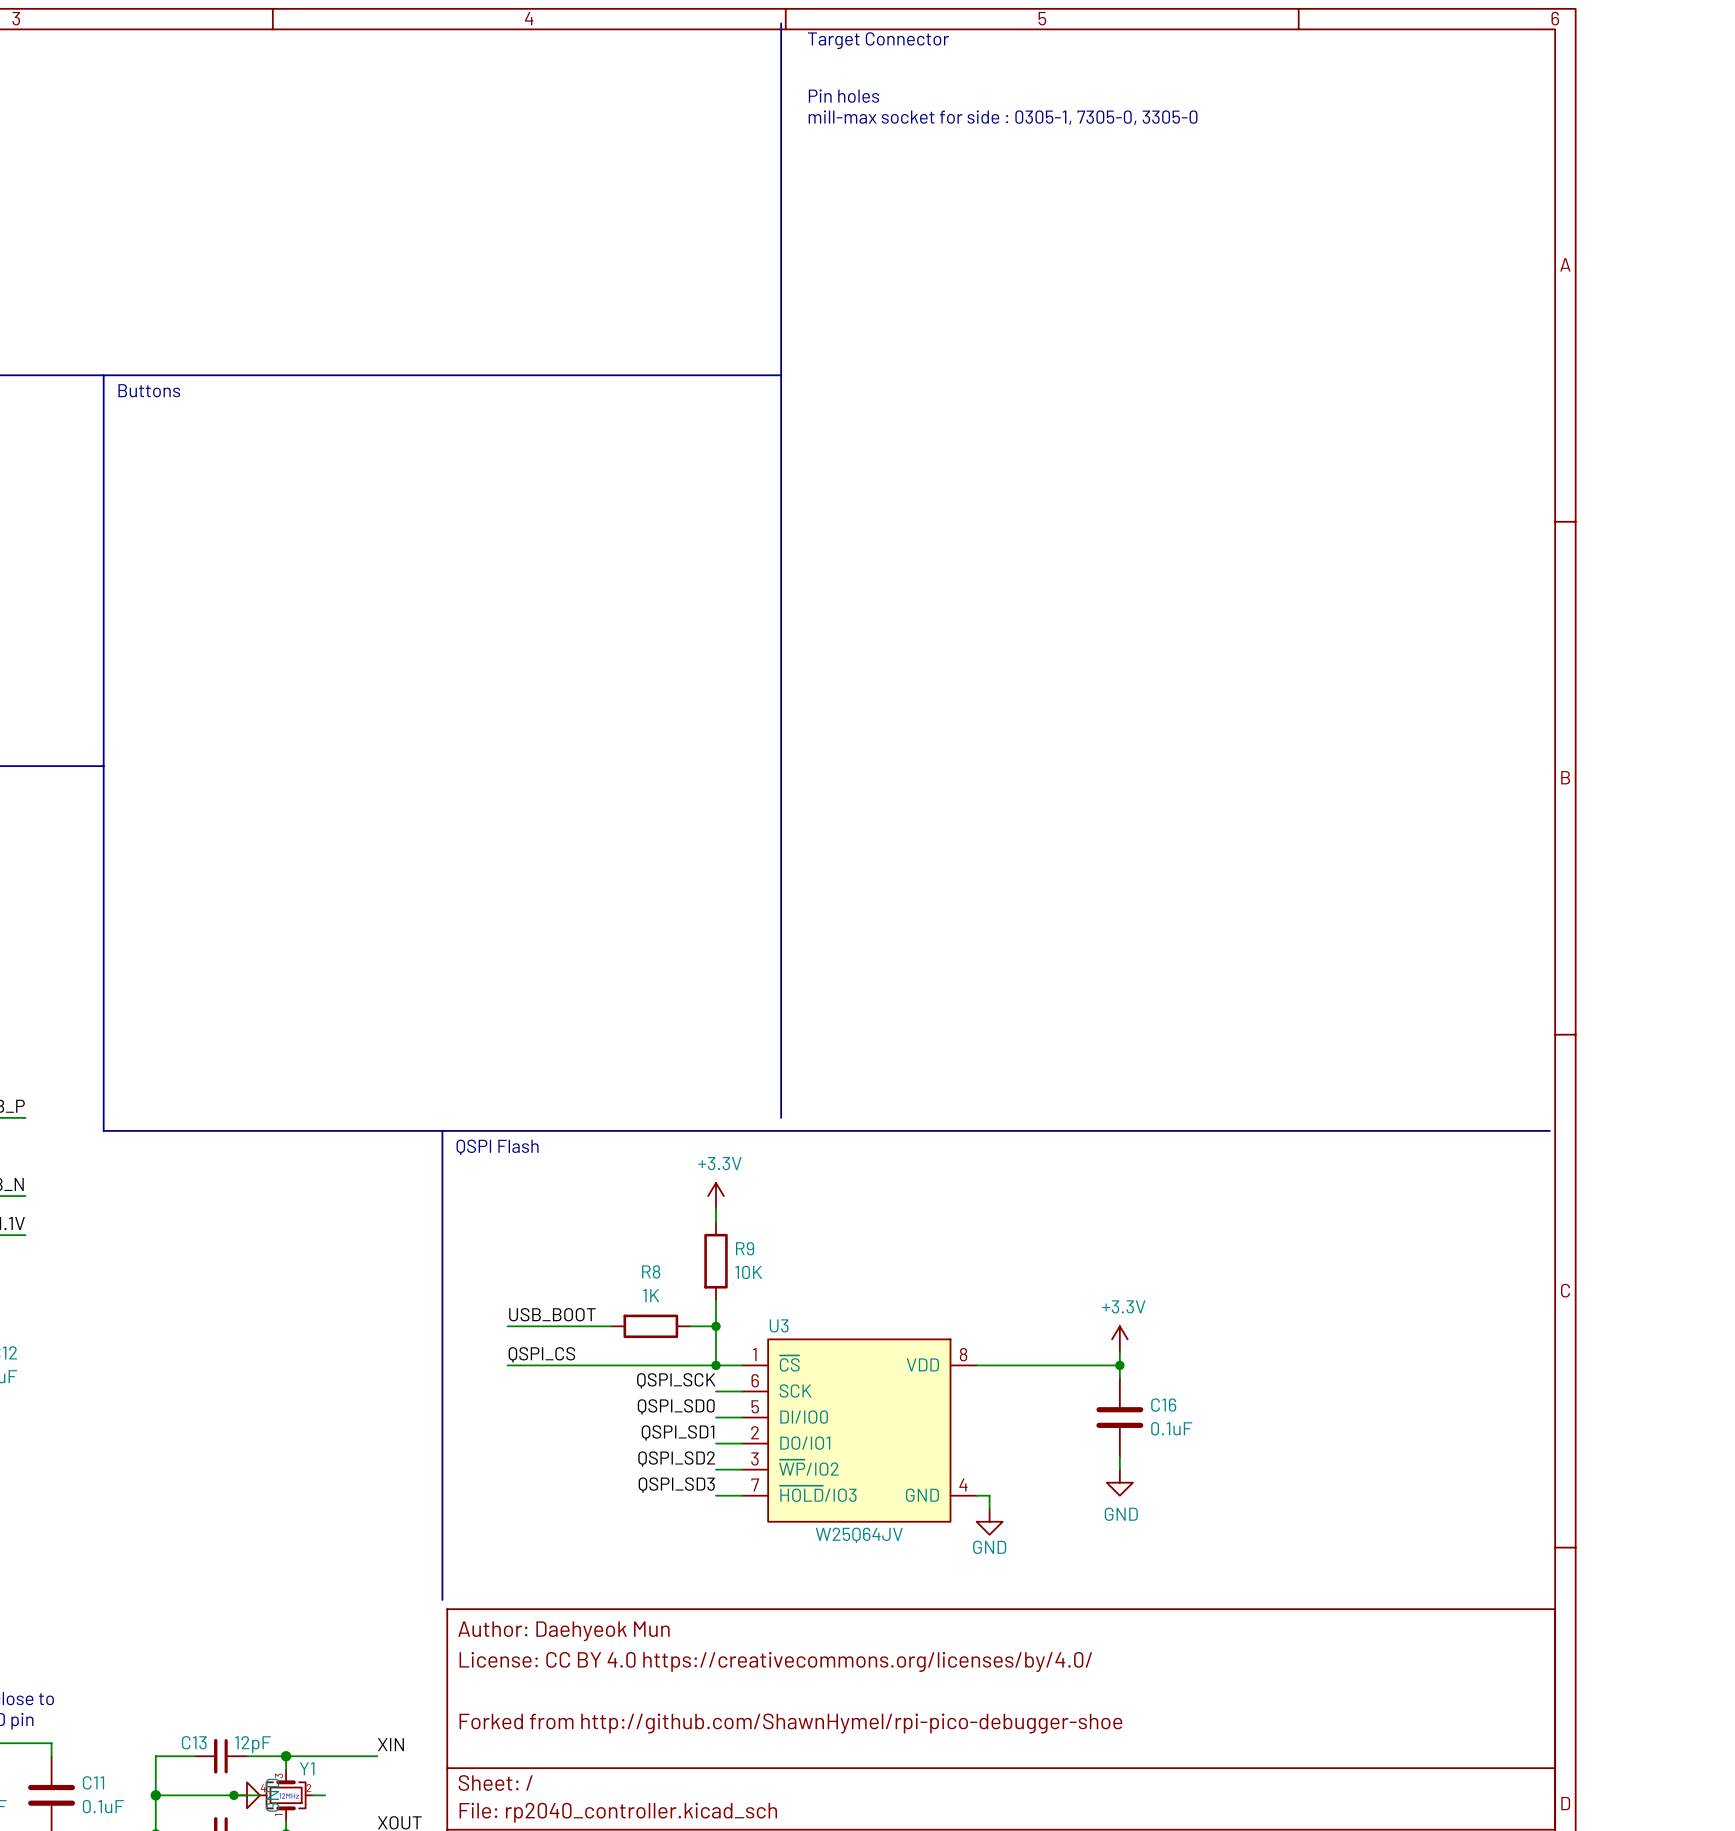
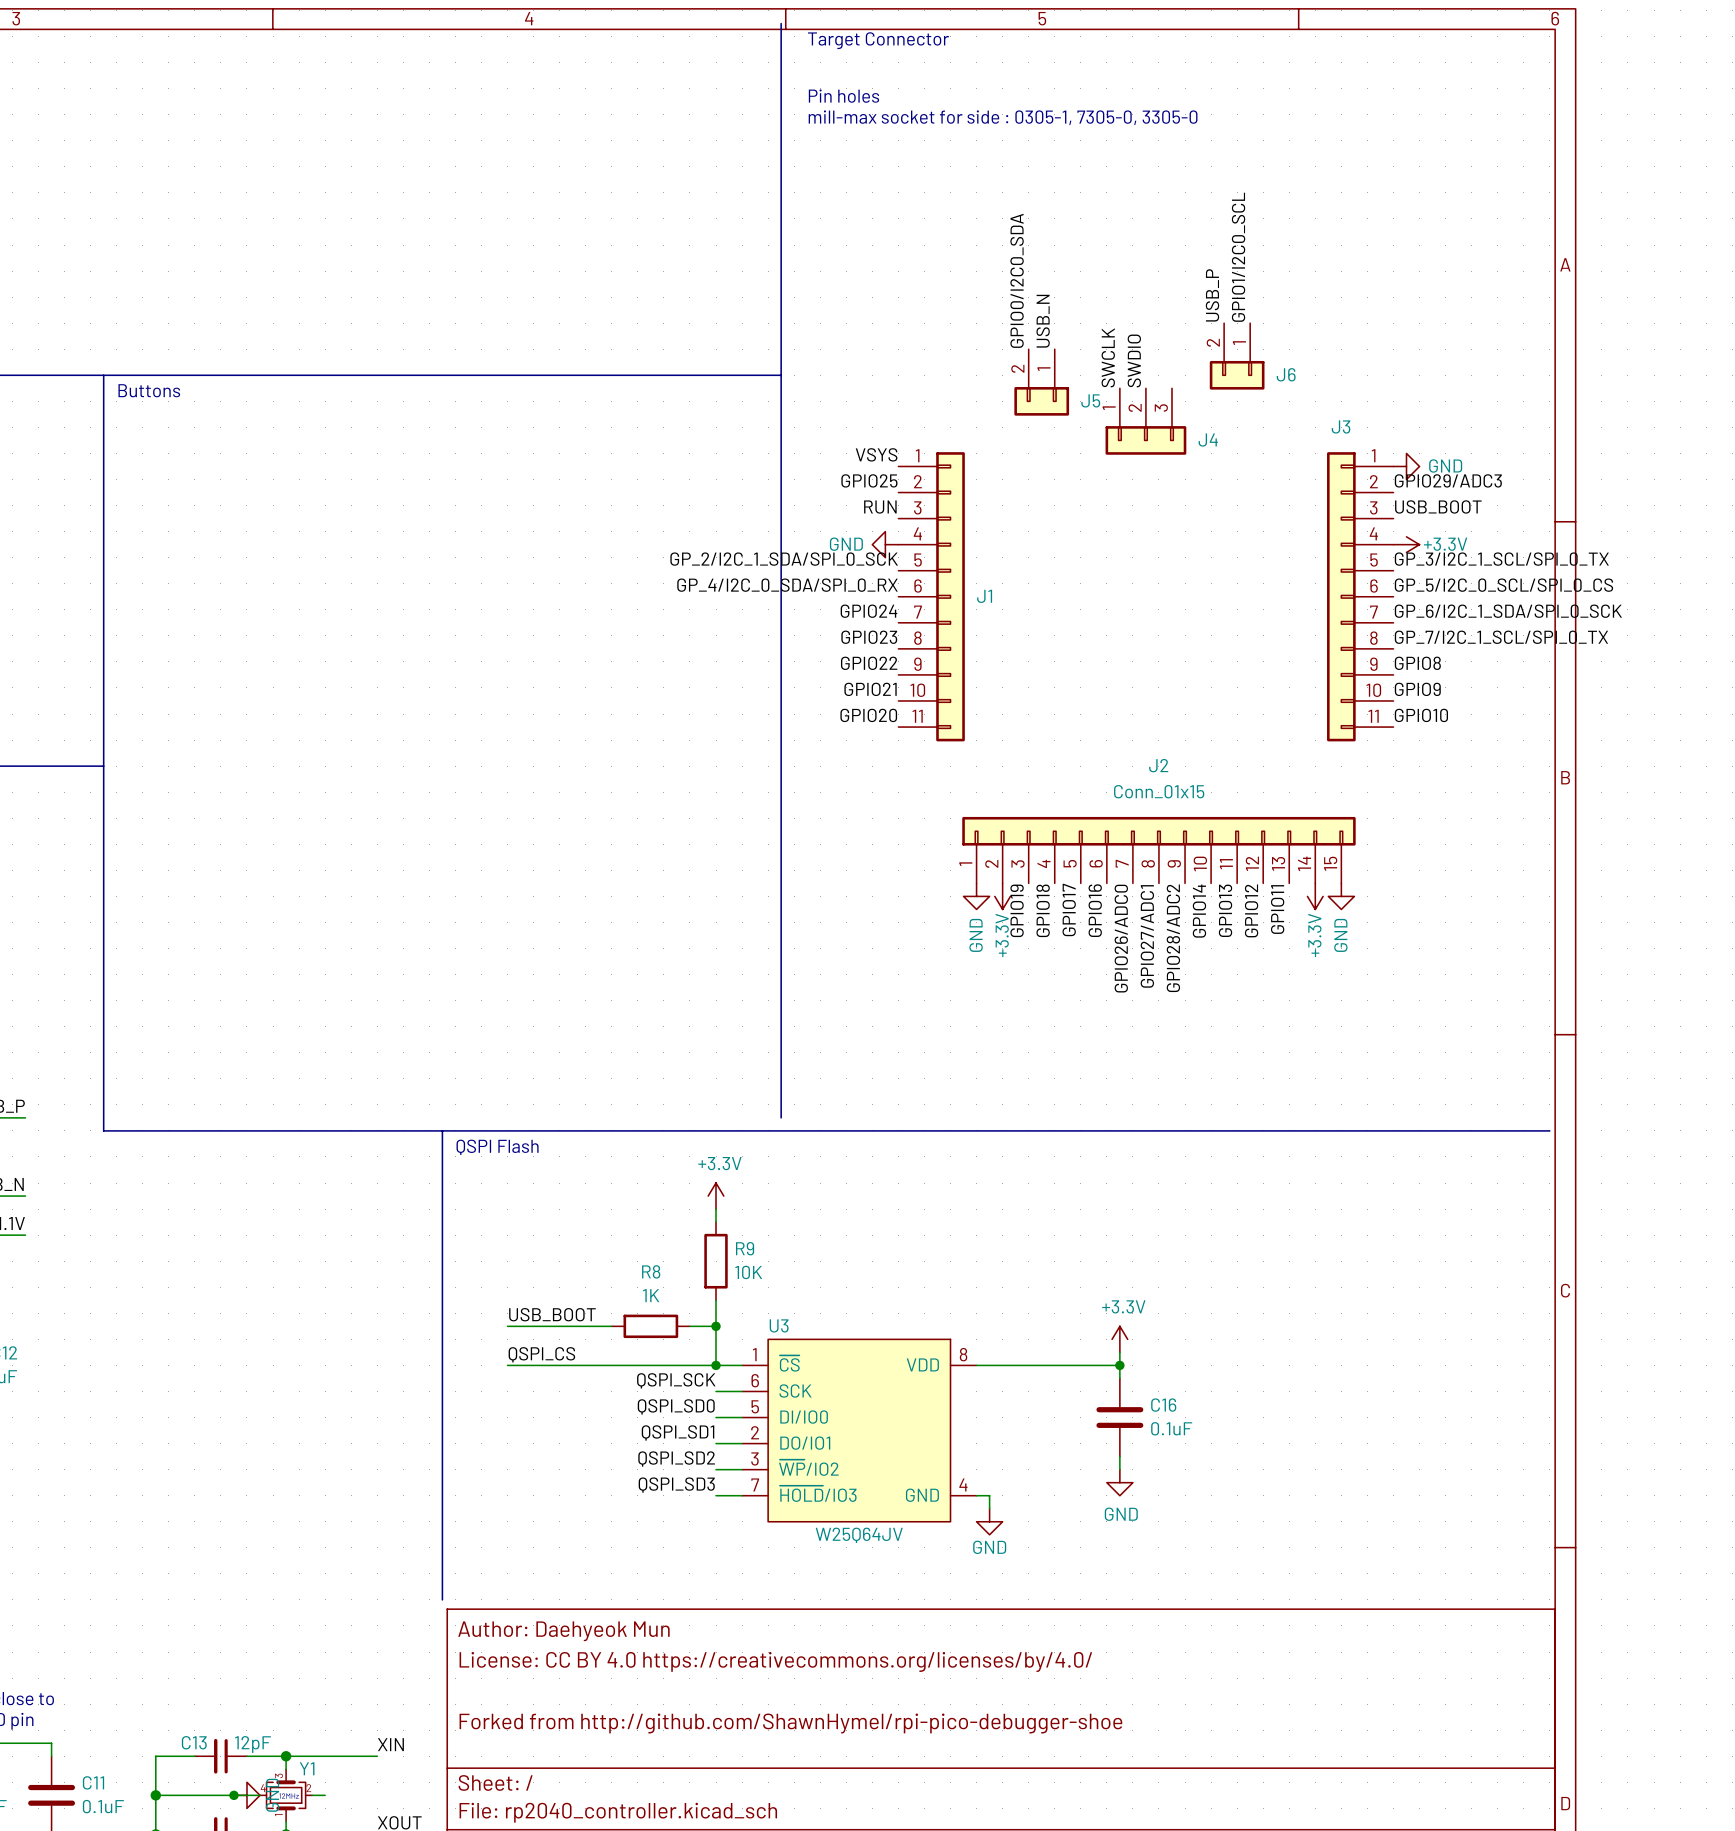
label: none -> GPIO1/I2C0_SCL (1238, 257)
label: none -> GPIO0/I2C0_SDA (1017, 280)
label: none -> USB_P (1212, 295)
label: none -> USB_N (1043, 321)
J6: none -> (1237, 356)
label: none -> SWCLK (1108, 357)
label: none -> SWDIO (1134, 360)
J5: none -> (1041, 382)
J4: none -> (1145, 421)
label: none -> VSYS (876, 454)
power symbol: none -> GND (1406, 466)
label: none -> GPIO25 (869, 480)
label: none -> GPIO29/ADC3 (1448, 480)
label: none -> USB_BOOT (1438, 506)
label: none -> RUN (880, 507)
power symbol: none -> GND (885, 544)
power symbol: none -> +3.3V (1406, 544)
label: none -> GP_2/I2C_1_SDA/SPI_0_SCK (784, 559)
label: none -> GP_3/I2C_1_SCL/SPI_0_TX (1501, 559)
label: none -> GP_4/I2C_0_SDA/SPI_0_RX (787, 585)
label: none -> GP_5/I2C_0_SCL/SPI_0_CS (1503, 585)
J1: none -> (931, 596)
J3: none -> (1360, 596)
label: none -> GPIO24 (868, 611)
label: none -> GP_6/I2C_1_SDA/SPI_0_SCK (1508, 611)
label: none -> GPIO23 (869, 637)
label: none -> GP_7/I2C_1_SCL/SPI_0_TX (1501, 637)
label: none -> GPIO22 (869, 663)
label: none -> GPIO8 (1417, 663)
label: none -> GPIO21 (870, 689)
label: none -> GPIO9 (1417, 689)
label: none -> GPIO20 (868, 715)
label: none -> GPIO10 (1421, 715)
J2: none -> Conn_01x15 (1158, 850)
power symbol: none -> GND (976, 896)
power symbol: none -> +3.3V (1002, 896)
power symbol: none -> +3.3V (1315, 896)
power symbol: none -> GND (1341, 896)
label: none -> GPIO17 (1069, 909)
label: none -> GPIO11 (1277, 909)
label: none -> GPIO19 (1017, 910)
label: none -> GPIO18 (1043, 910)
label: none -> GPIO16 (1095, 910)
label: none -> GPIO13 (1225, 910)
label: none -> GPIO12 (1251, 910)
label: none -> GPIO14 (1199, 911)
label: none -> GPIO27/ADC1 (1147, 936)
label: none -> GPIO26/ADC0 (1121, 938)
label: none -> GPIO28/ADC2 (1173, 938)

